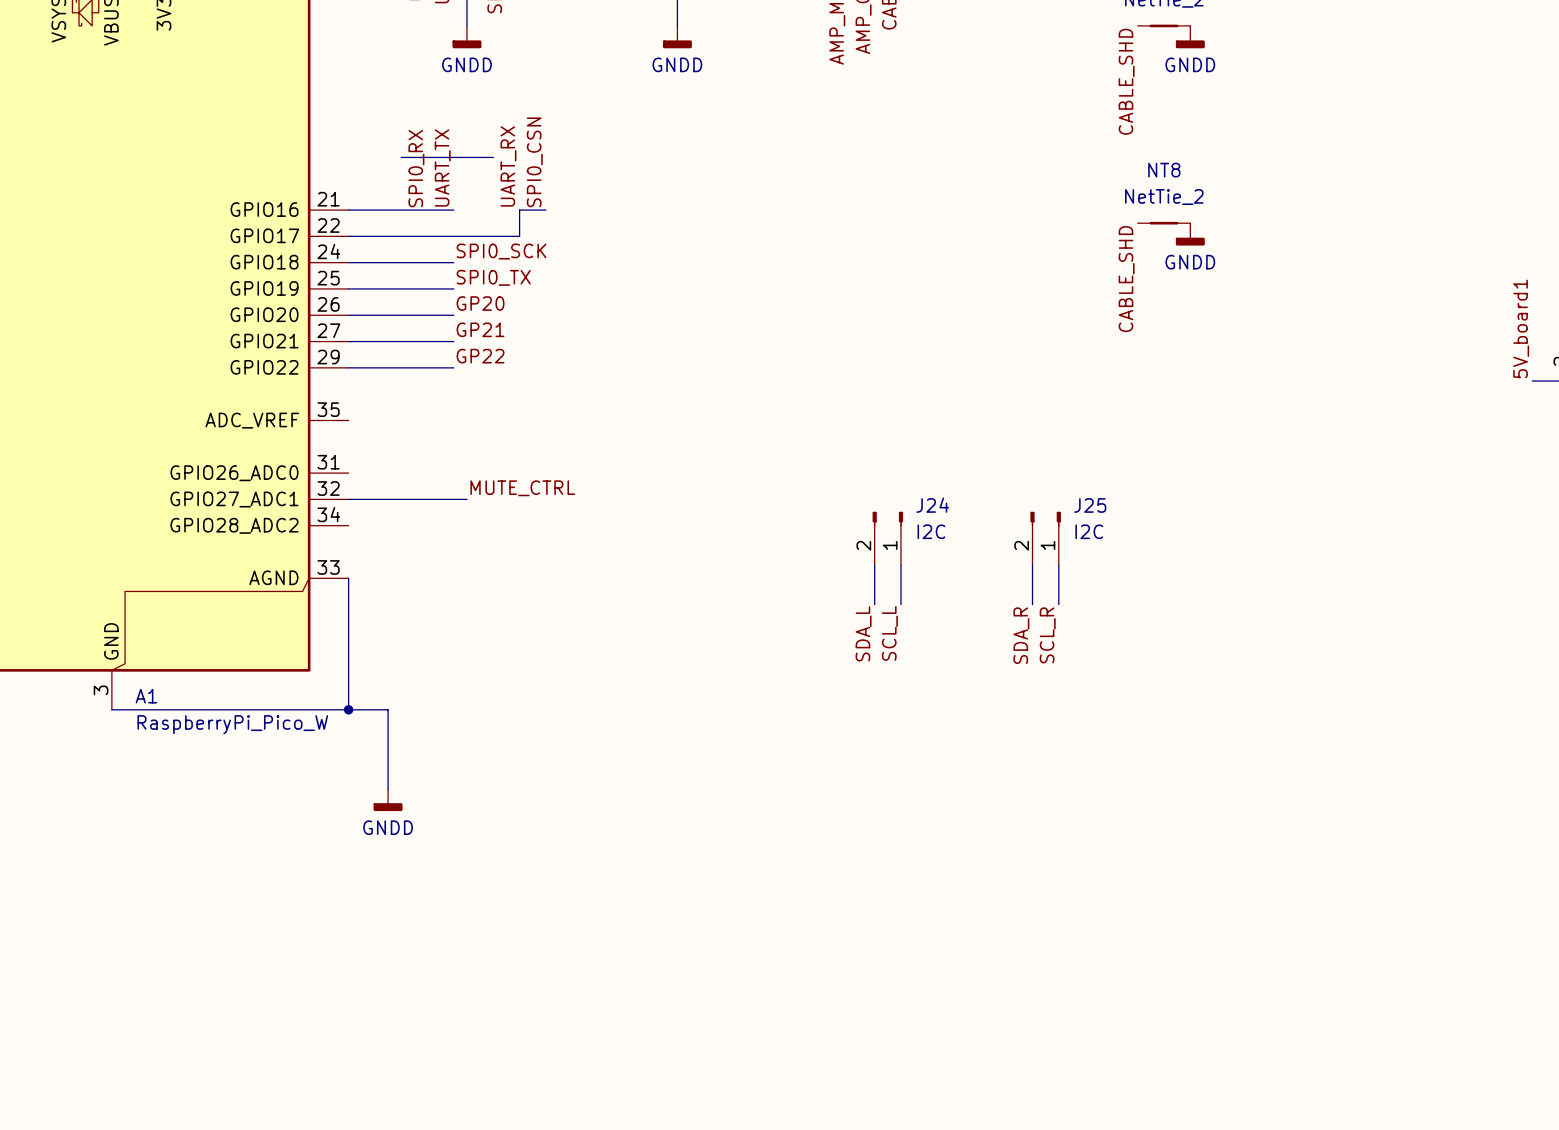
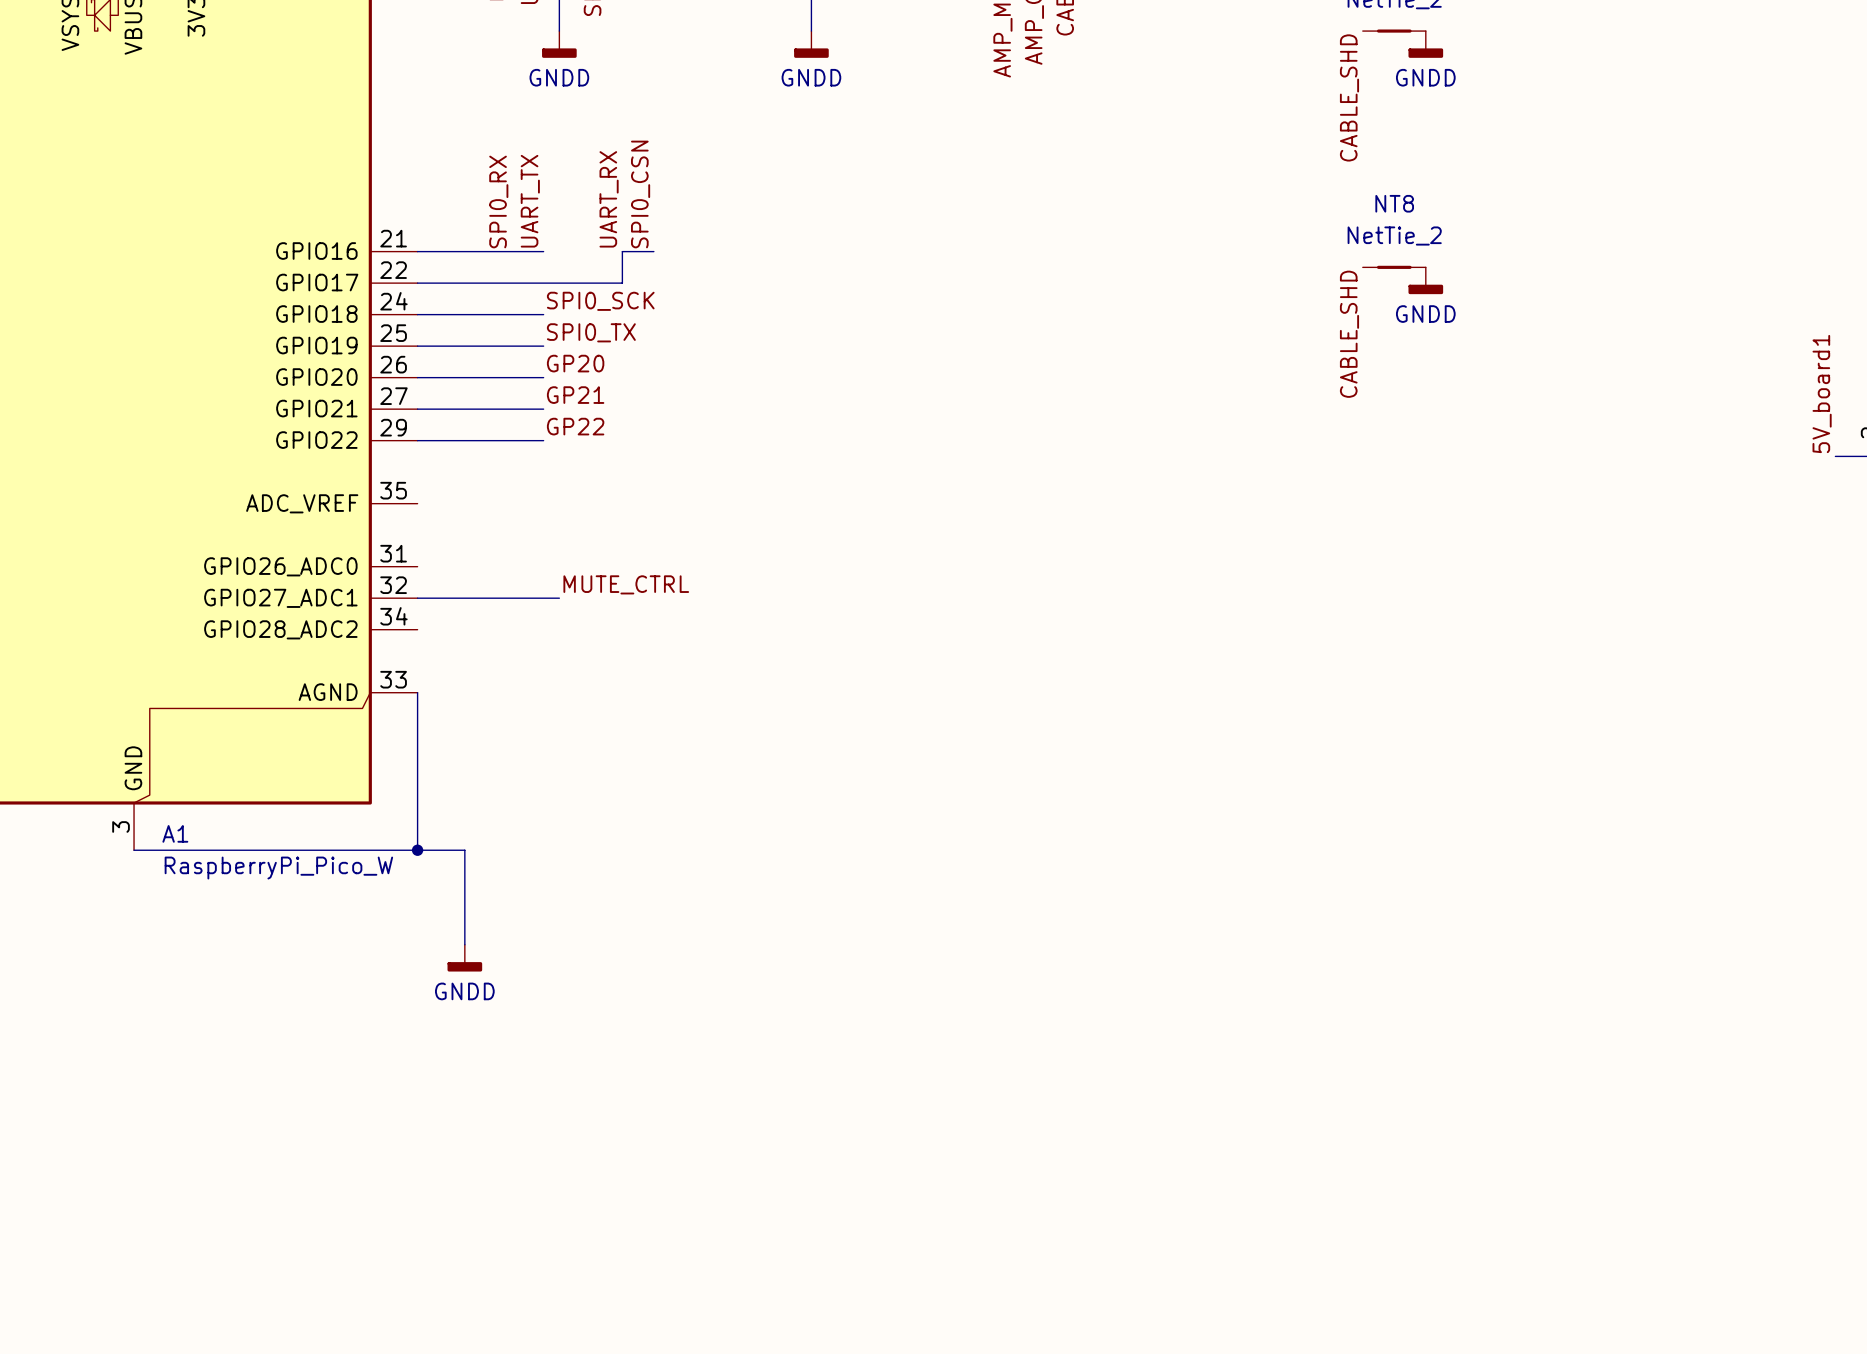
wire: (401, 157) (493, 157) -> none
J24: I2C (887, 538) -> none
J25: I2C (1045, 538) -> none
wire: (874, 565) (874, 604) -> none
wire: (900, 565) (900, 604) -> none
wire: (1032, 565) (1032, 604) -> none
wire: (1058, 565) (1058, 604) -> none
label: SDA_L (863, 633) -> none
label: SCL_L (889, 633) -> none
label: SDA_R (1021, 635) -> none
label: SCL_R (1047, 635) -> none

